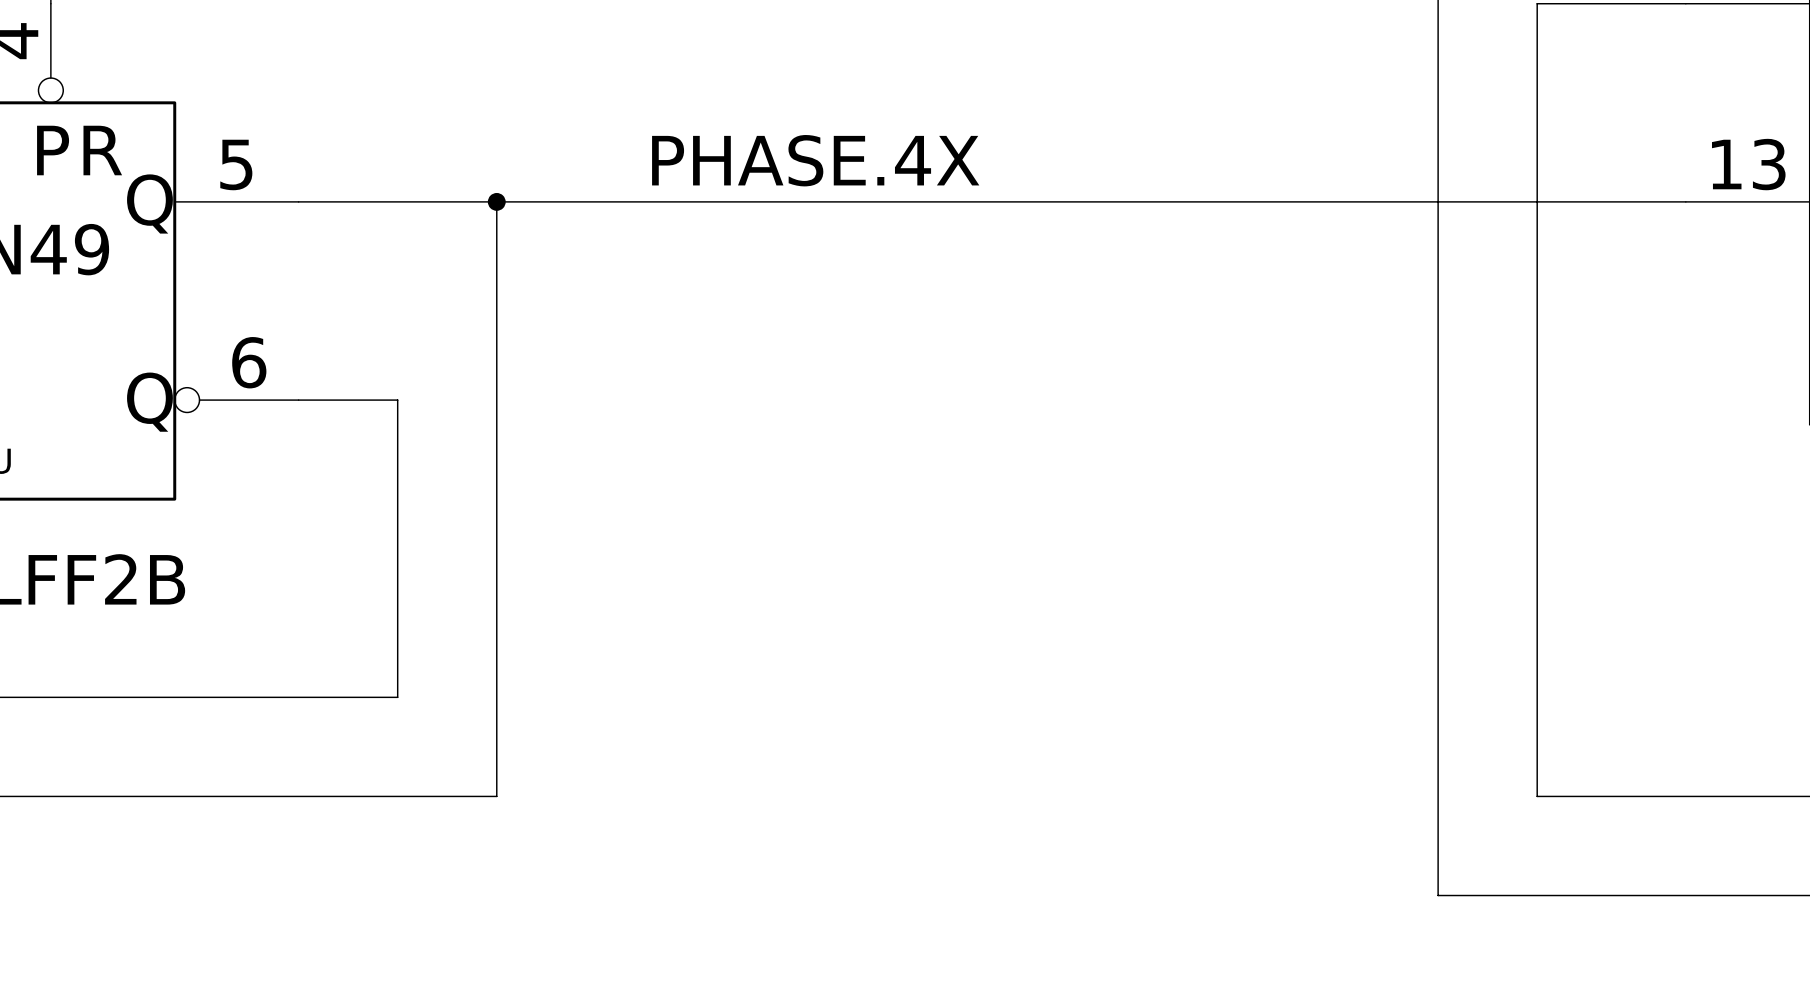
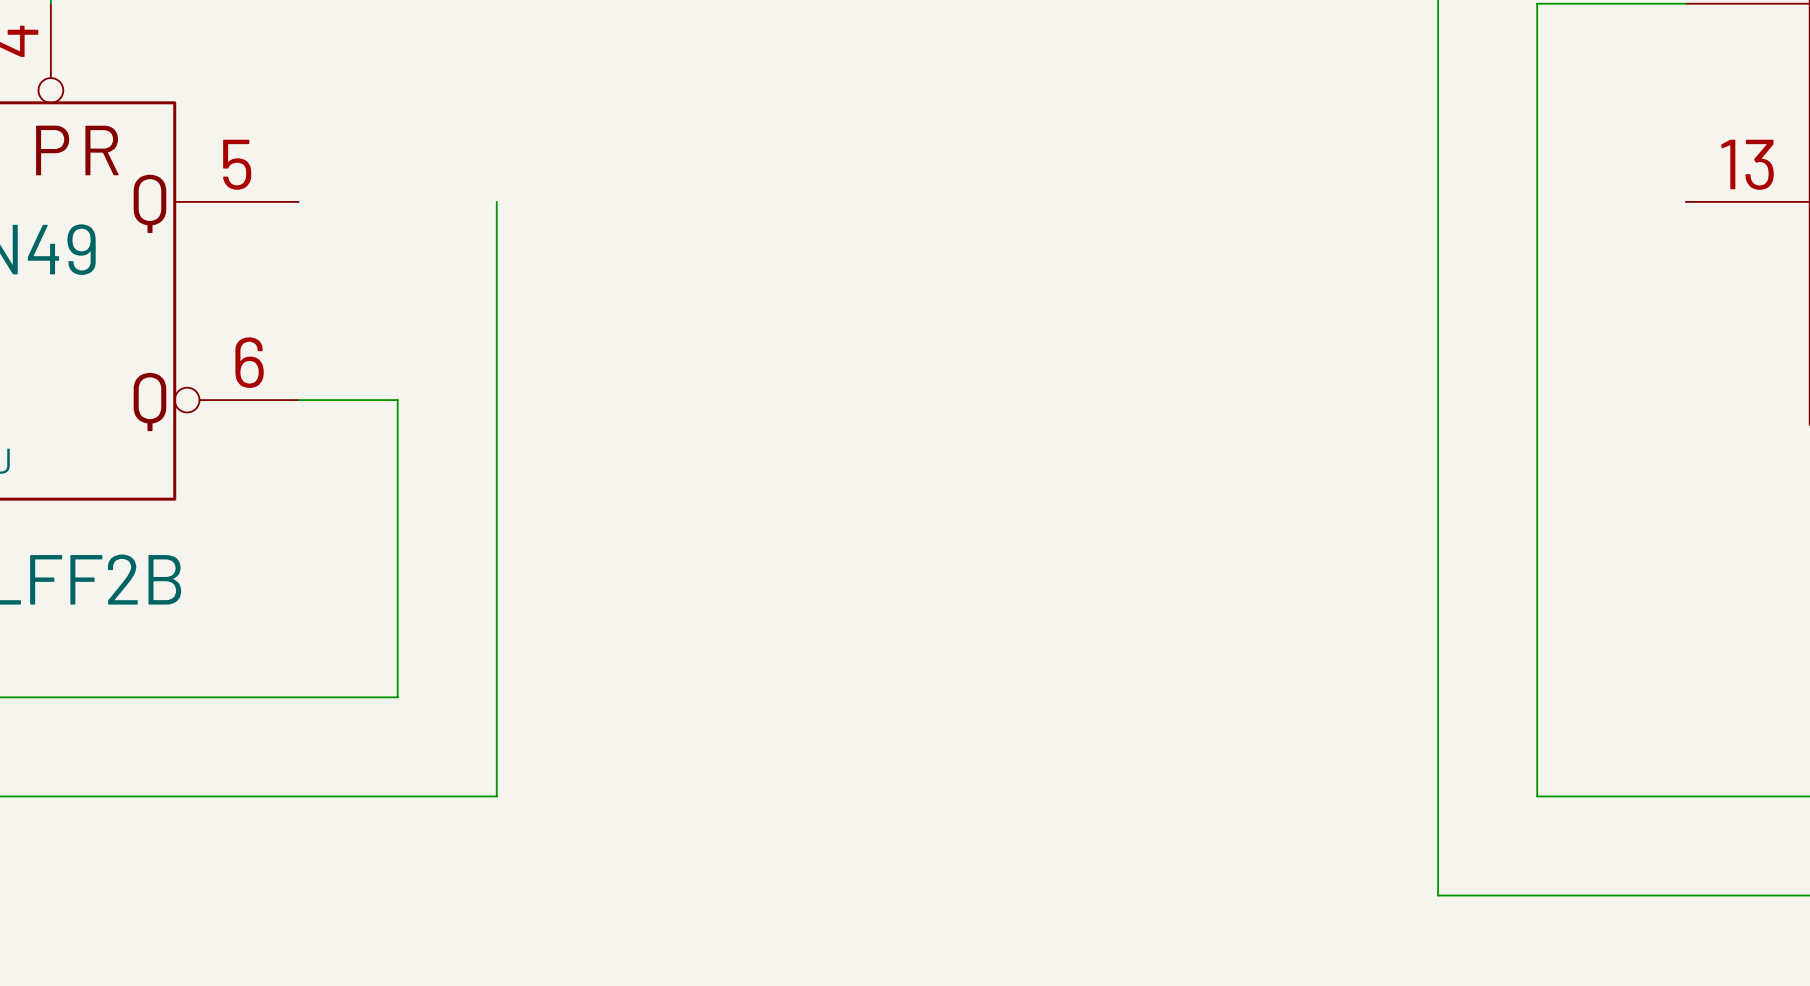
label: PHASE.4X (815, 160) -> none
wire: (298, 201) (1685, 201) -> none
junction: (496, 201) -> none

